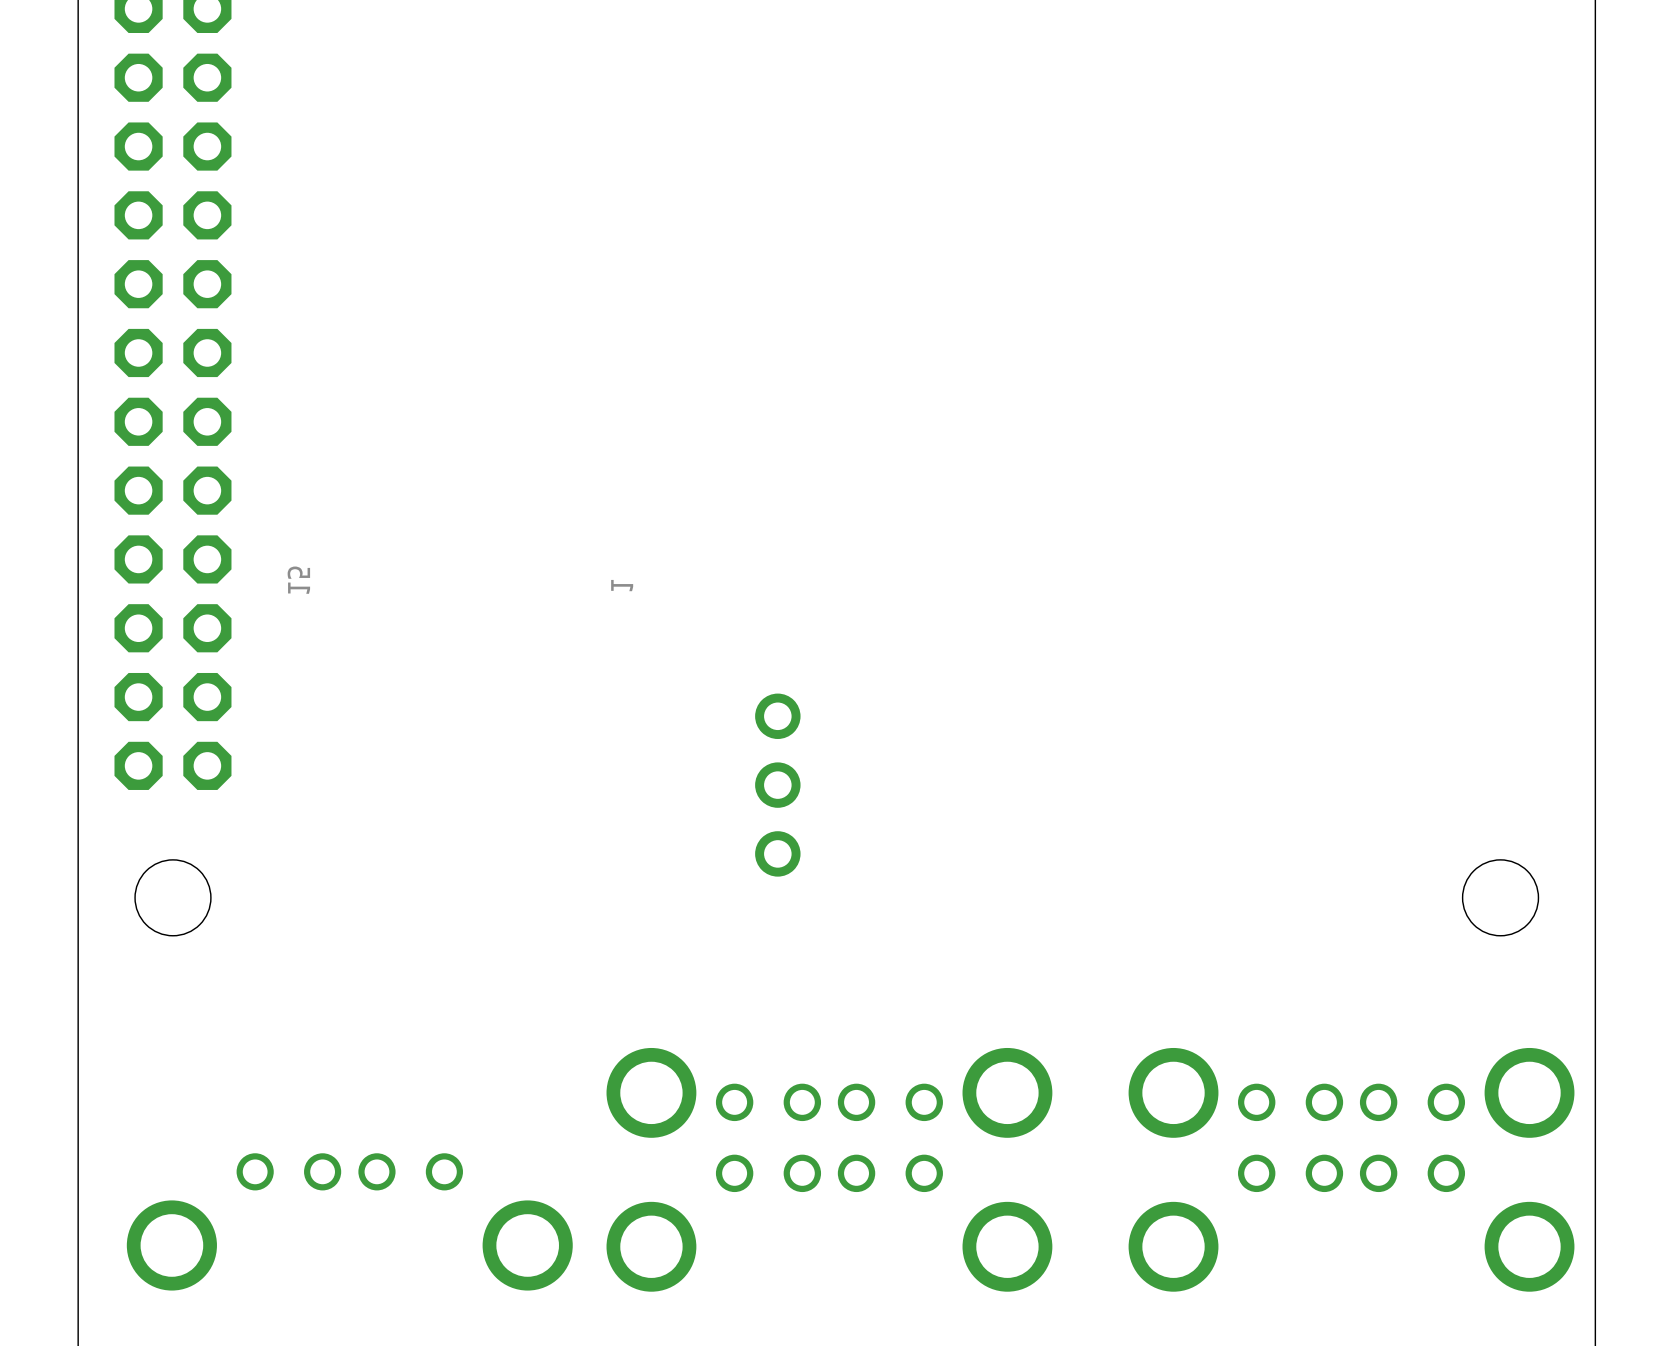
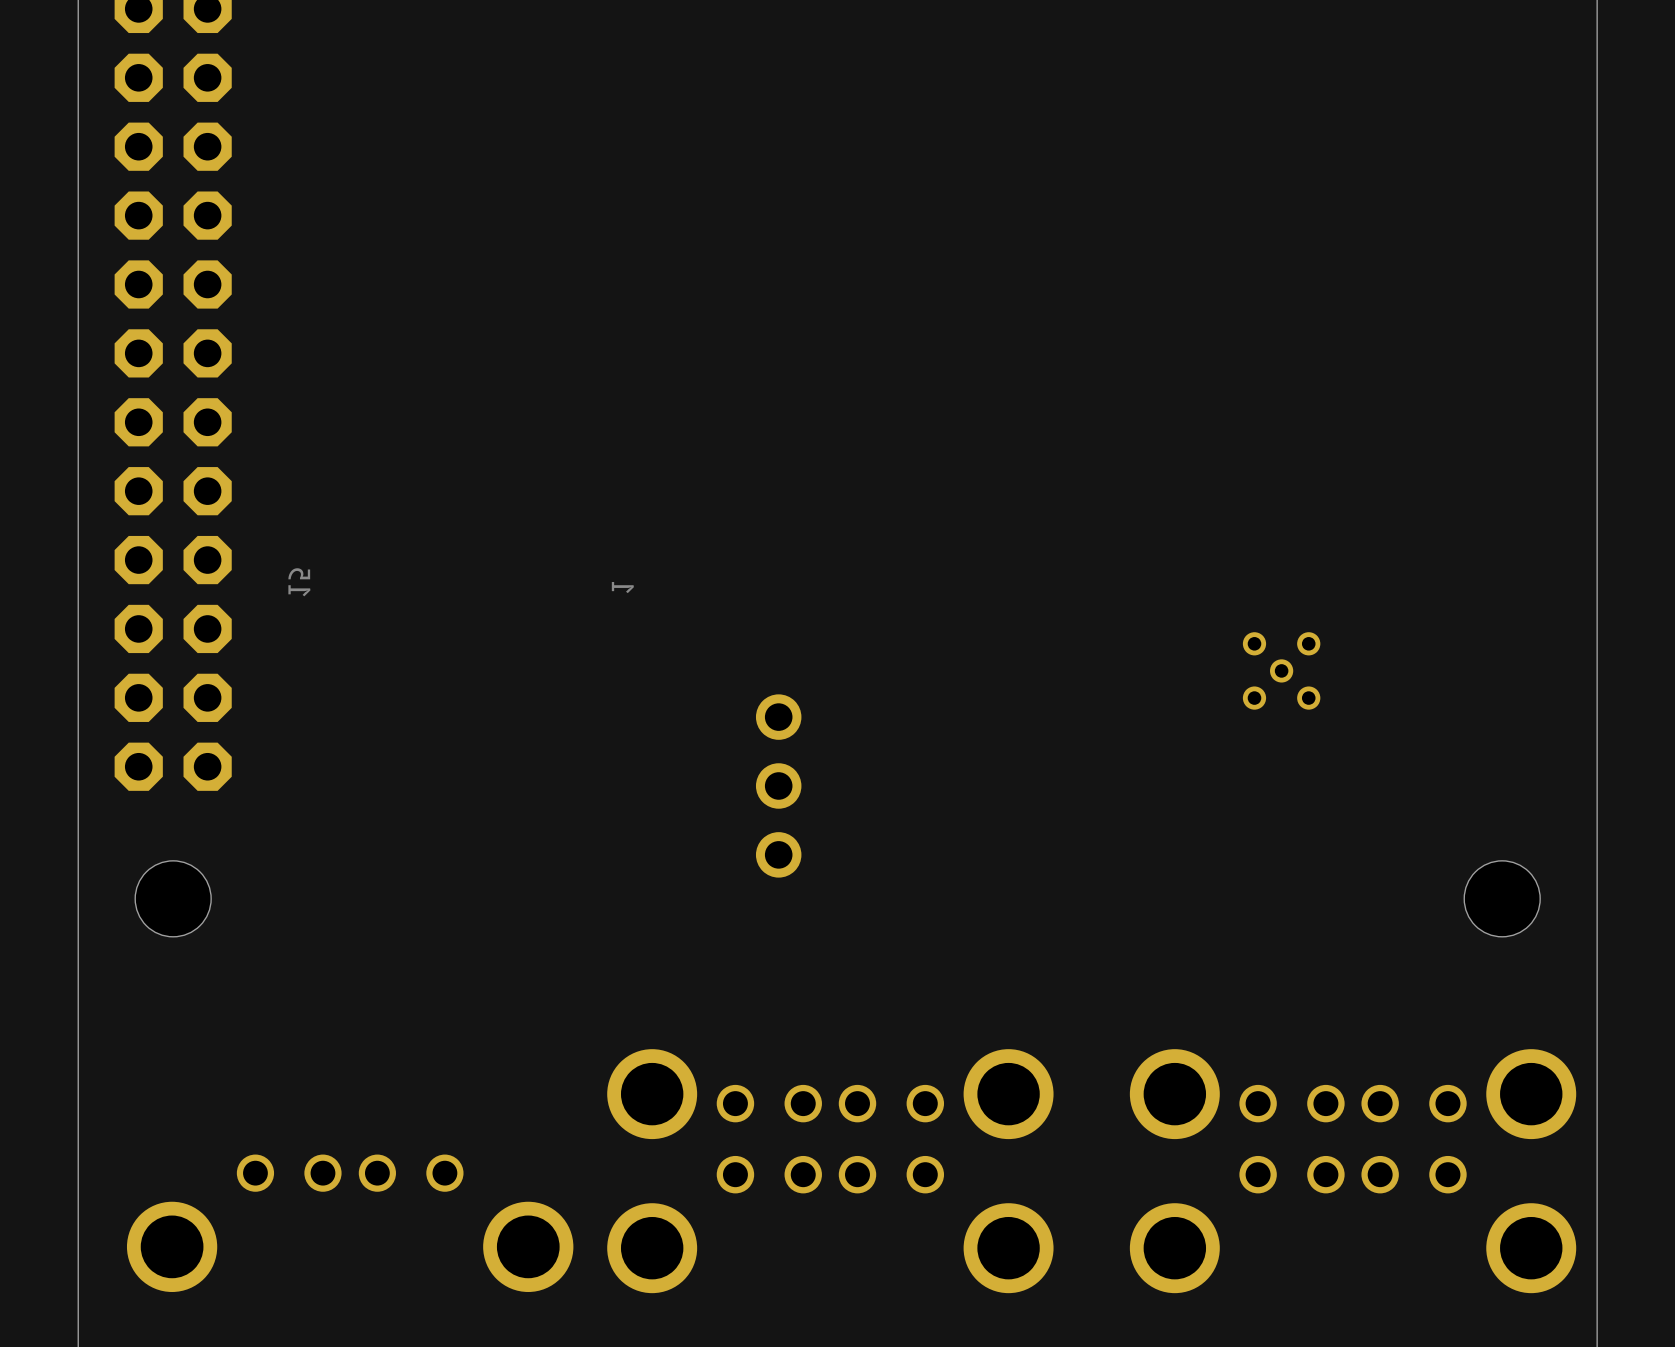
part: none -> (1281, 670)

